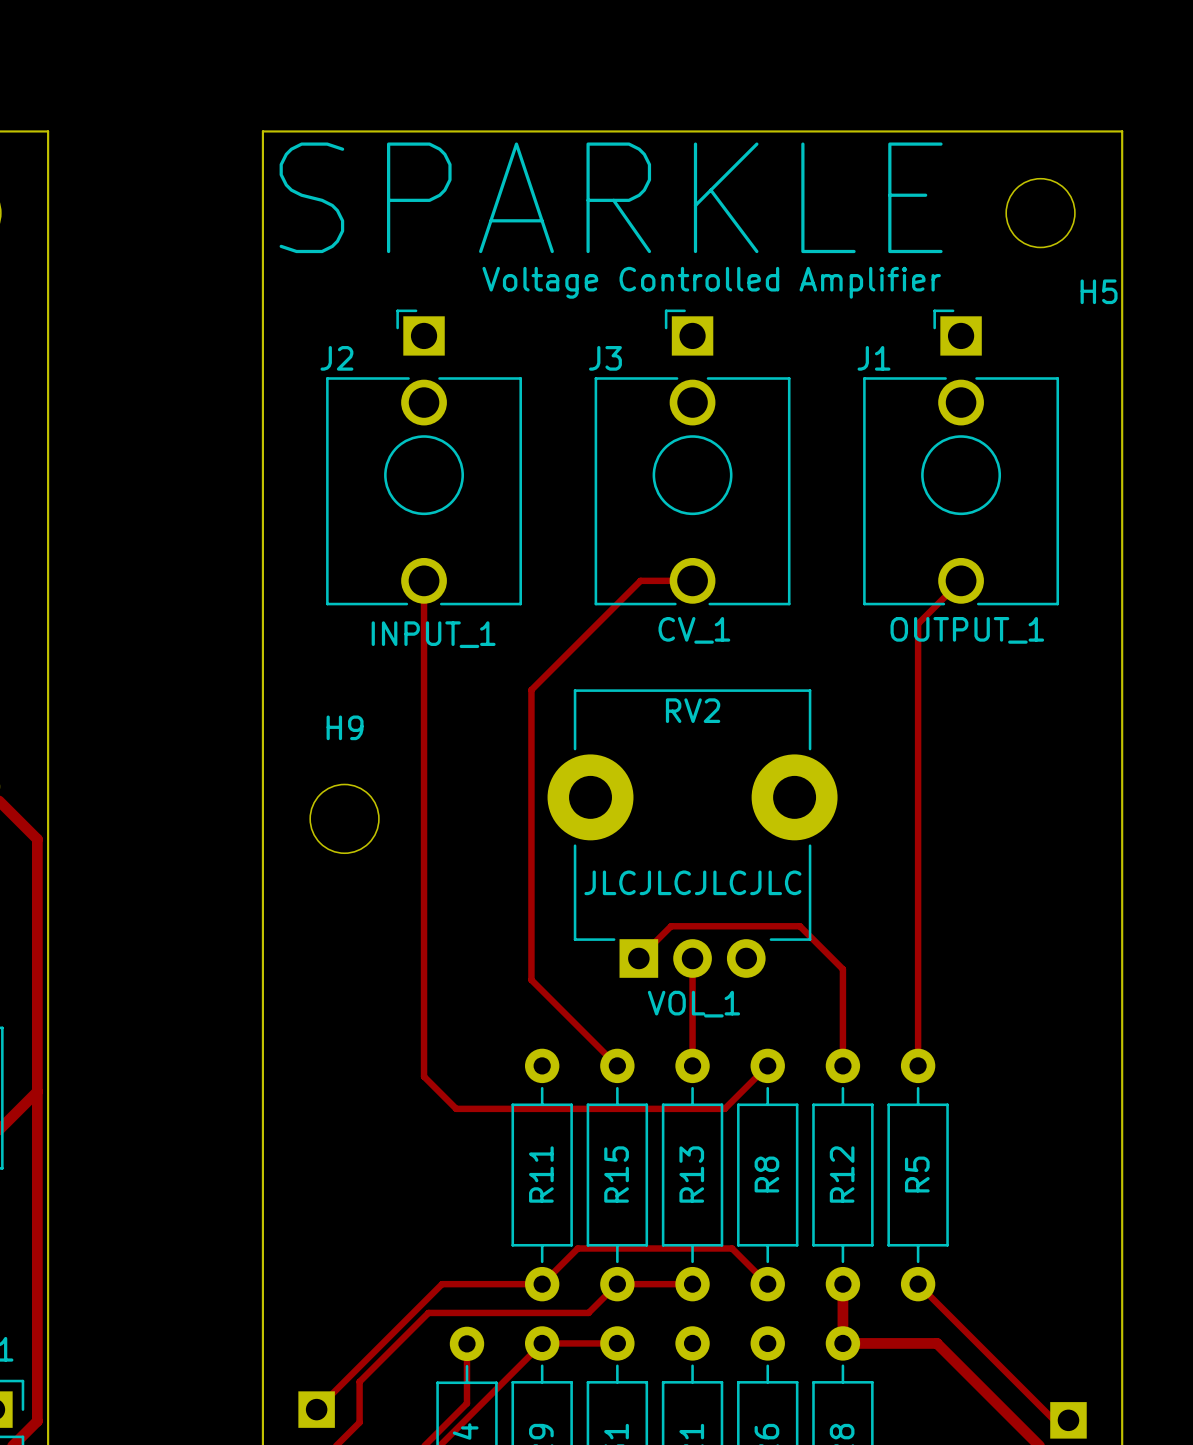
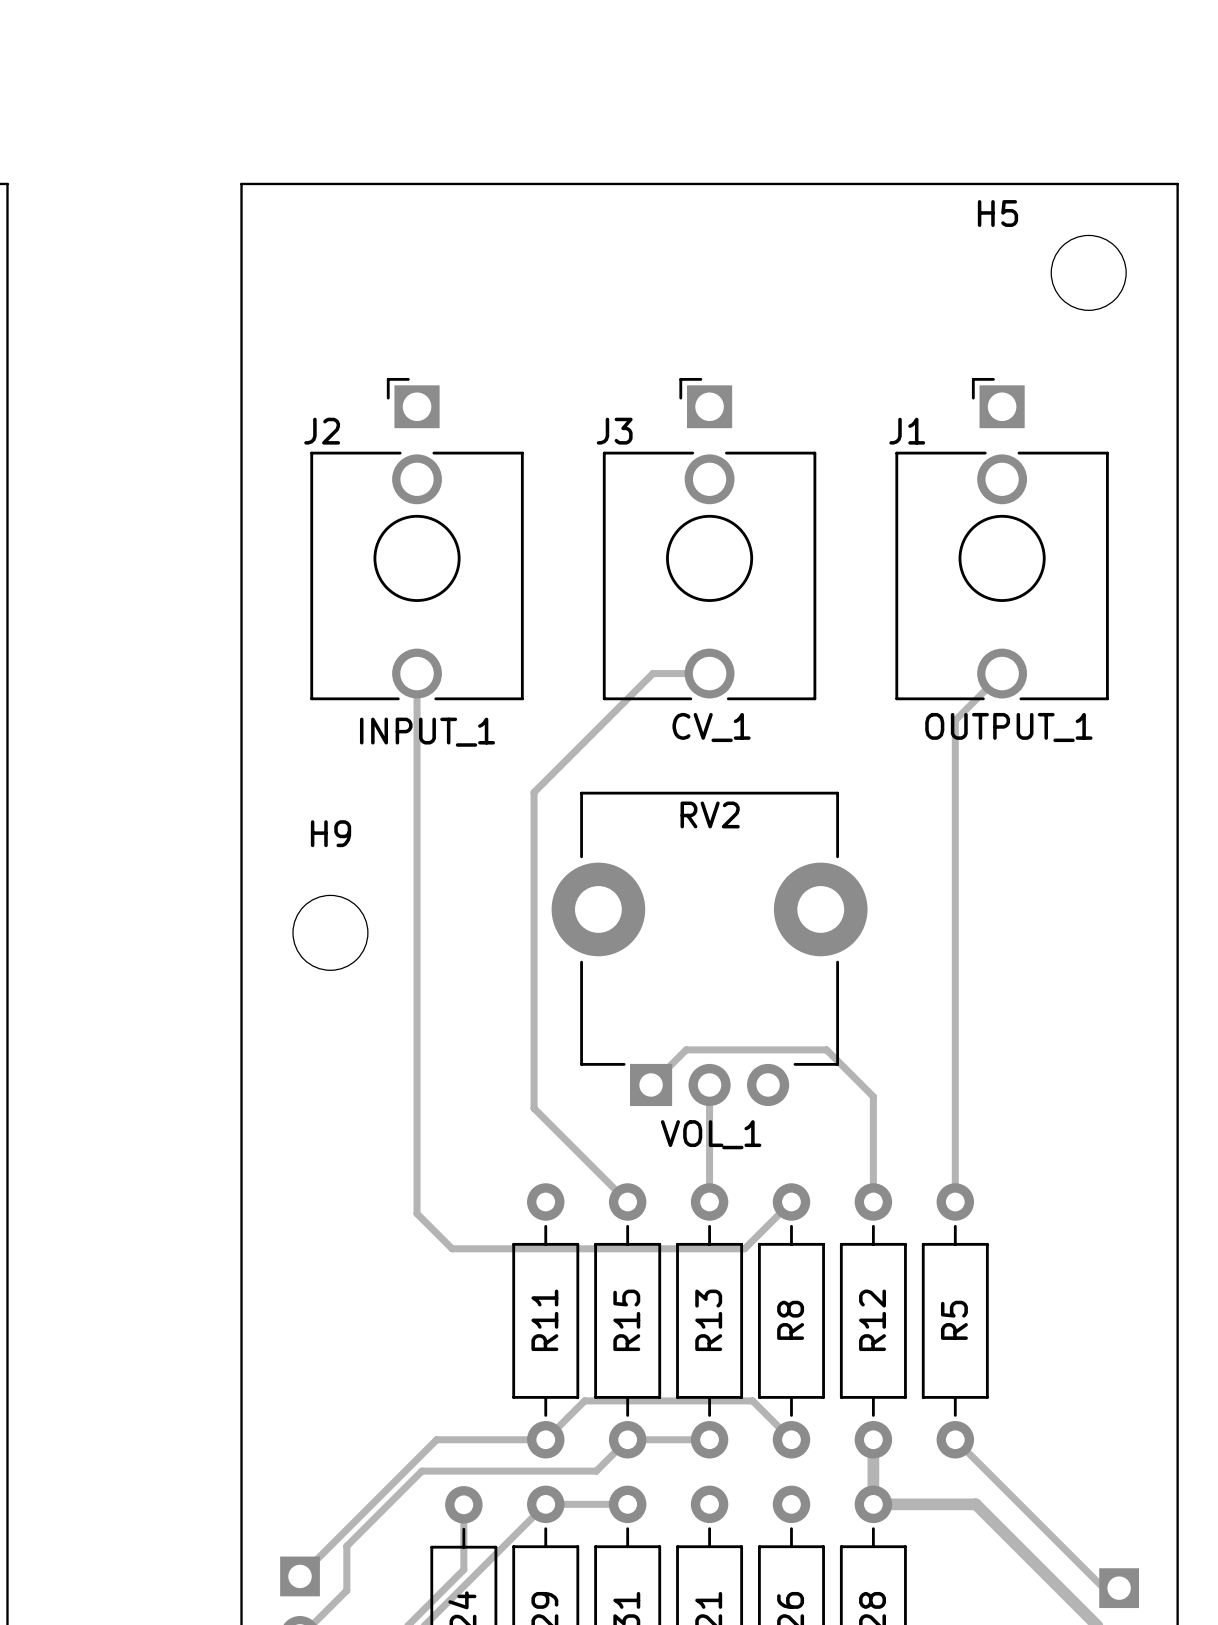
text: SPARKLE (611, 197) -> none
text: Voltage Controlled Amplifier (711, 282) -> none
H5 name position: H5 (1099, 291) -> H5 (997, 213)
text: JLCJLCJLCJLC (692, 882) -> none

